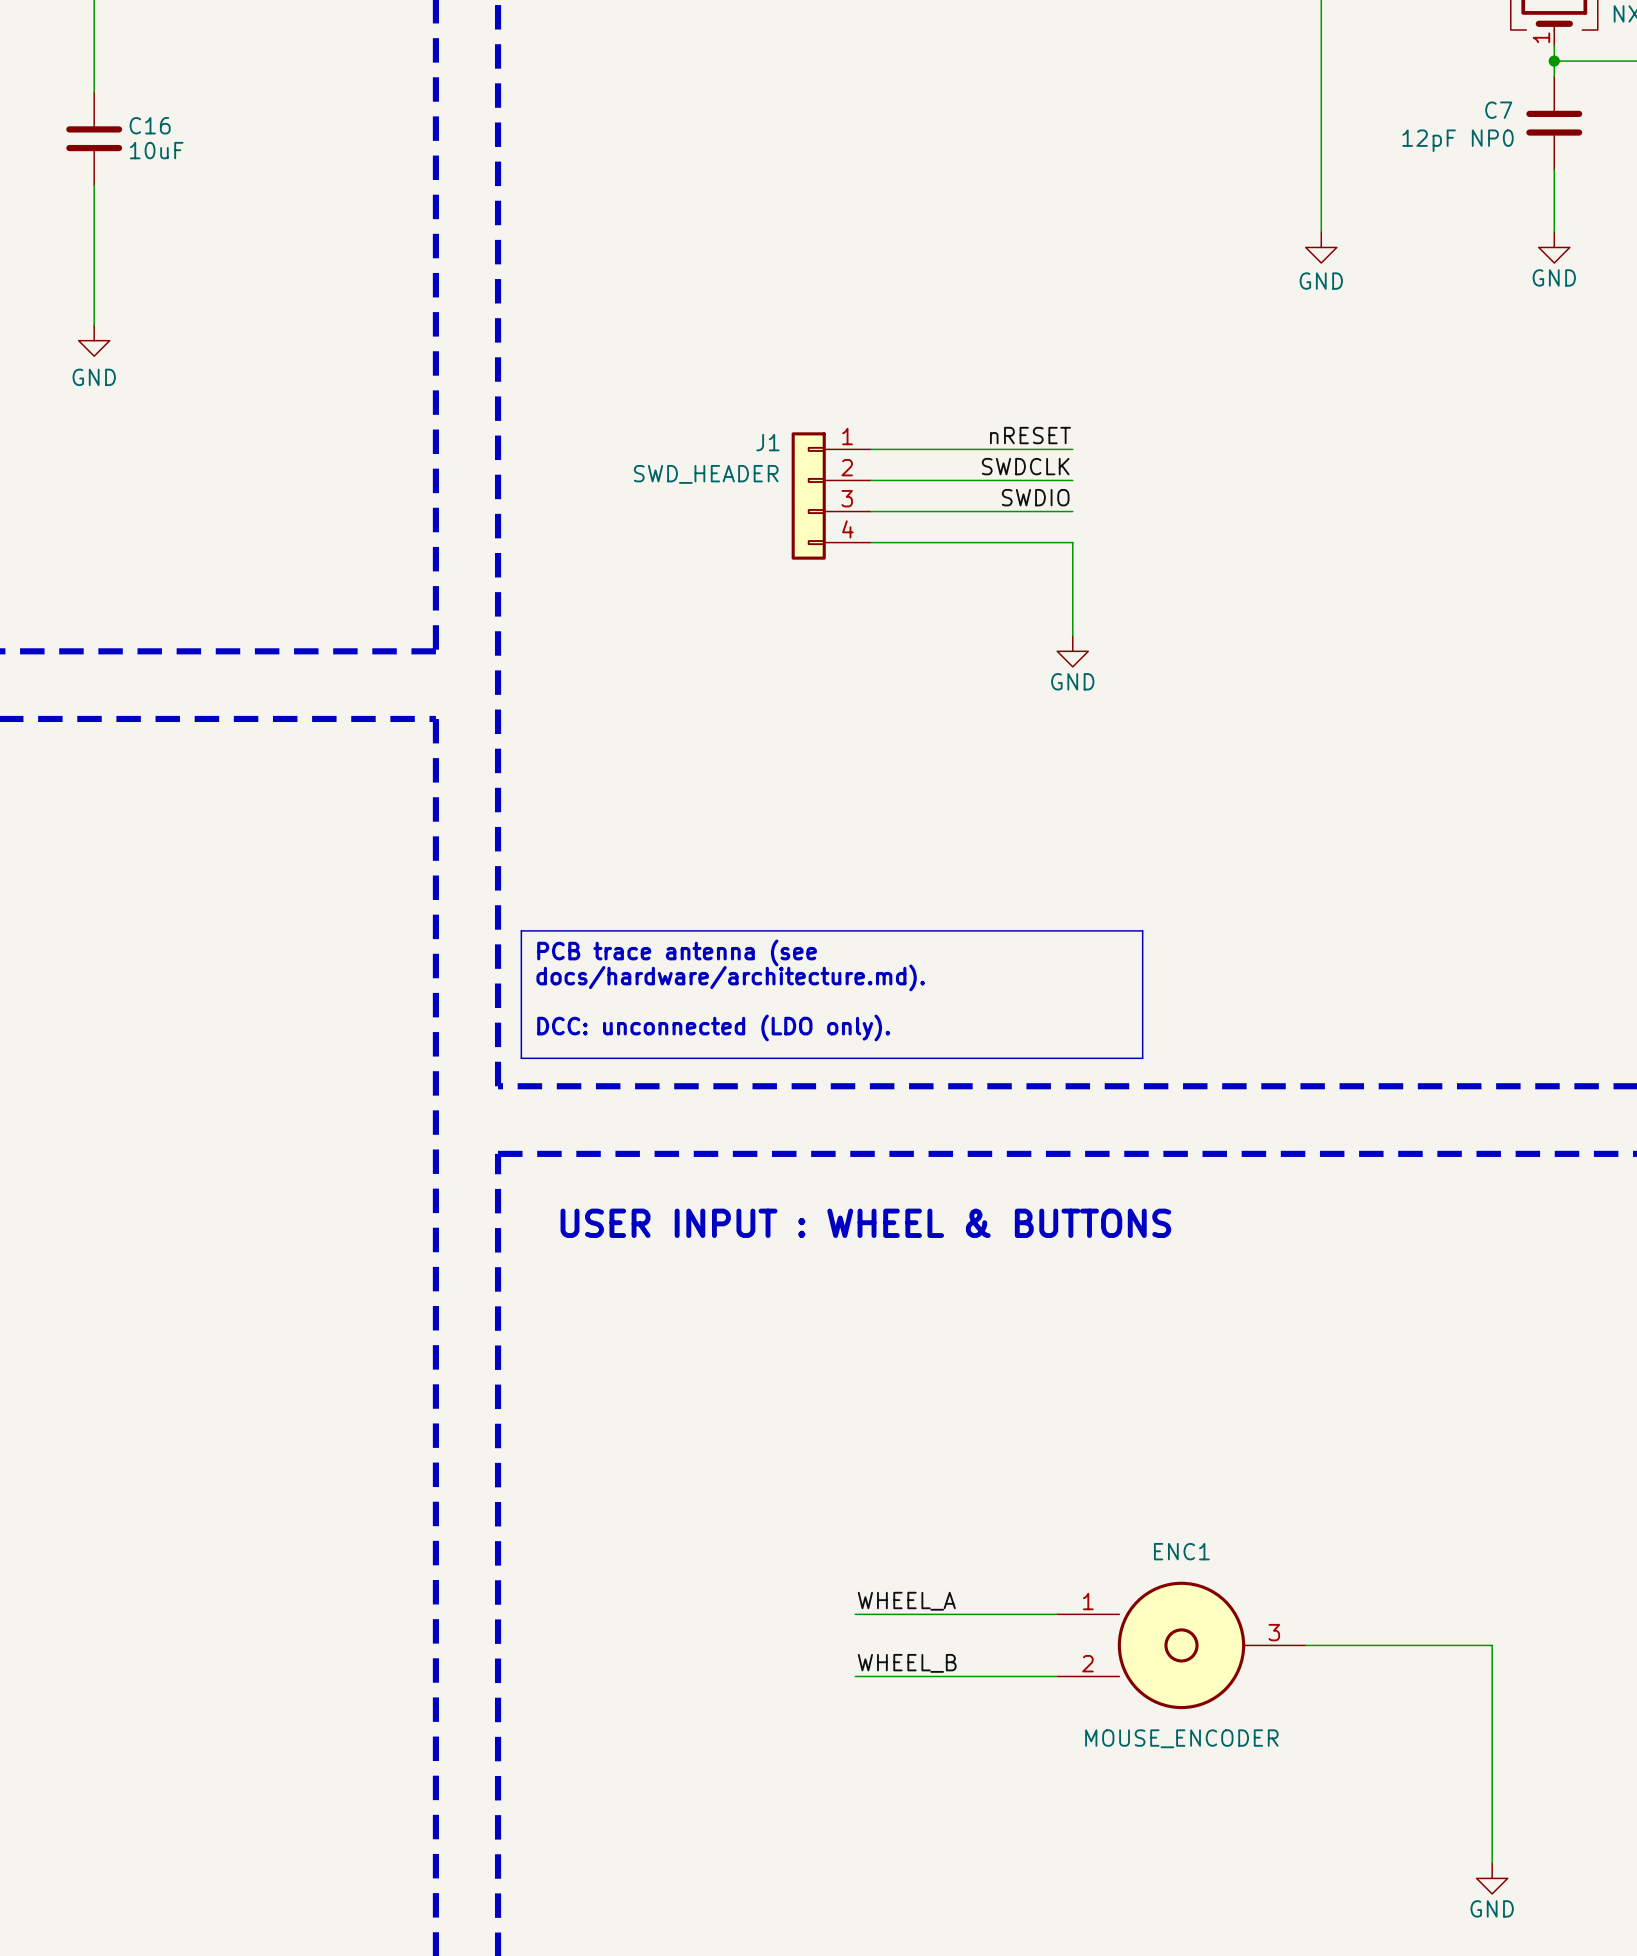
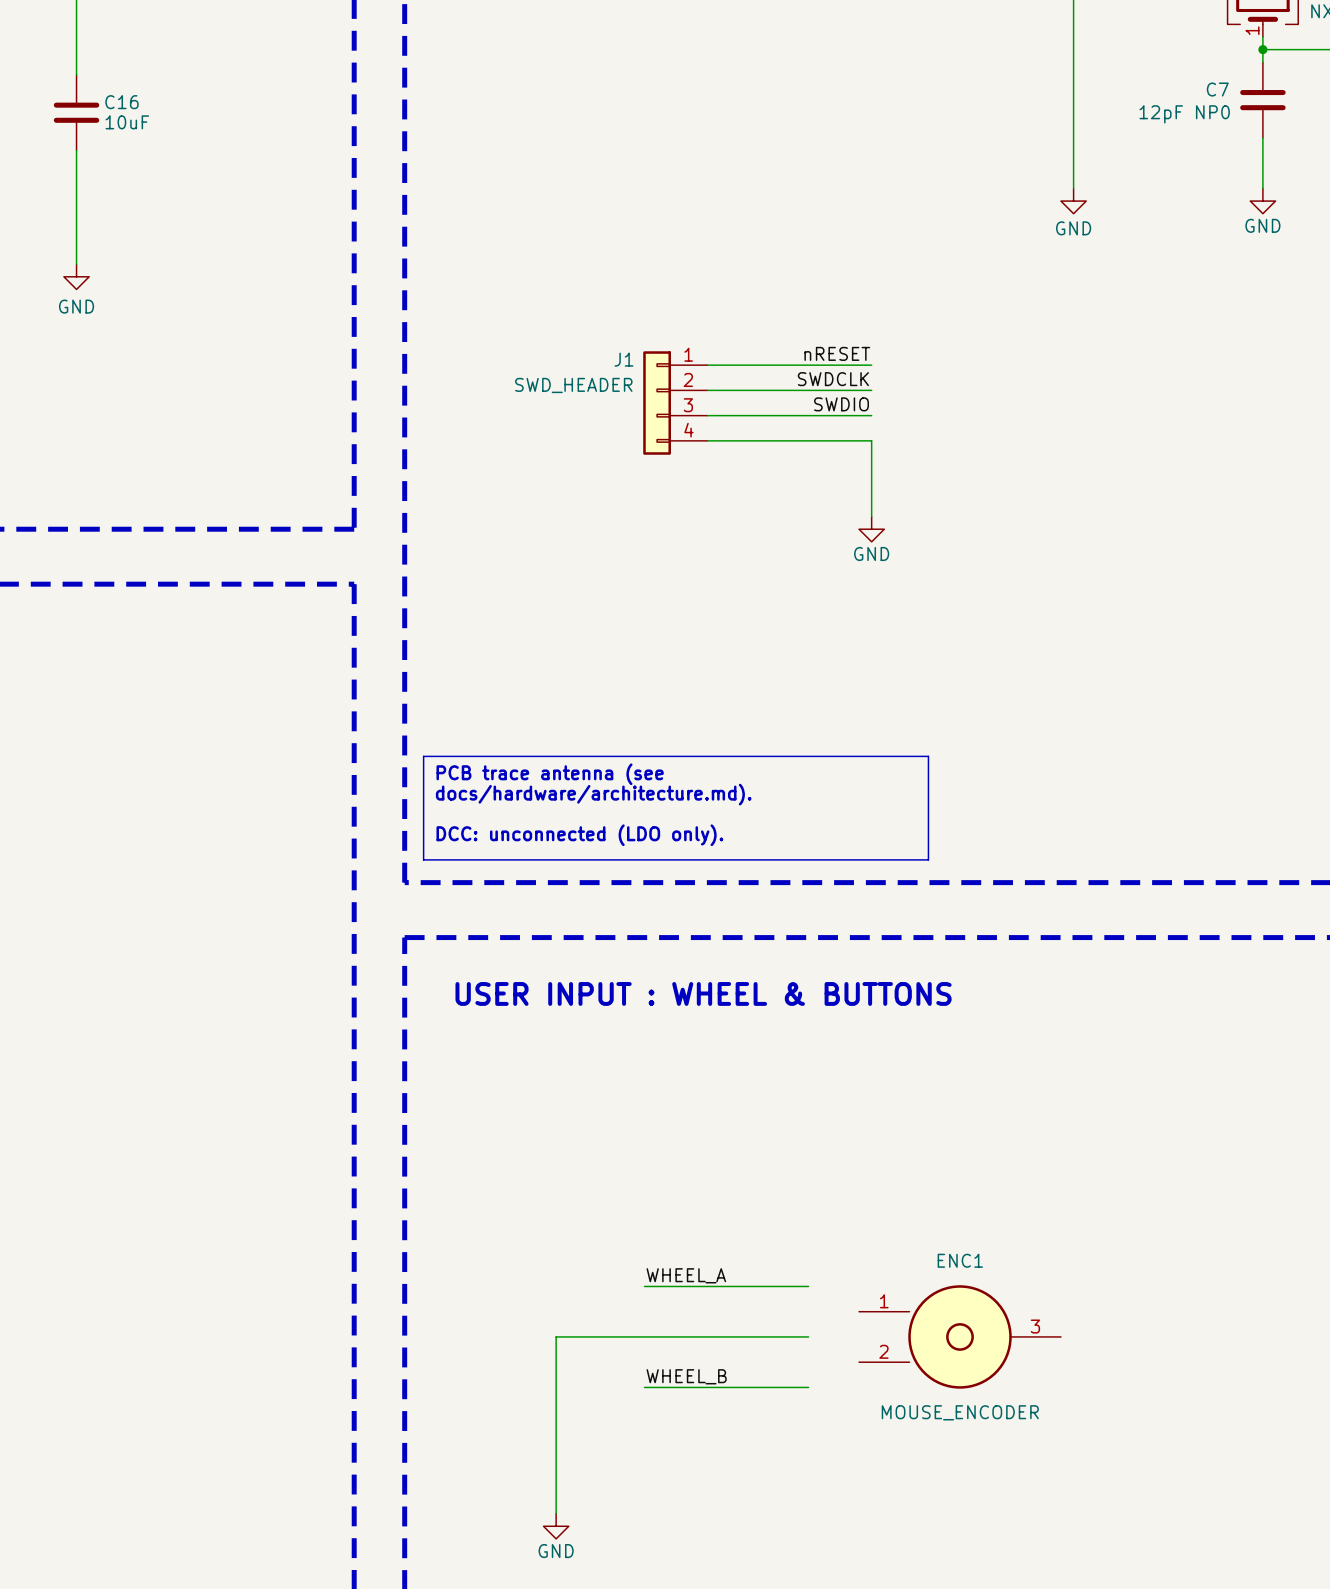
label position: WHEEL_A (906, 1601) -> WHEEL_A (686, 1275)
wire: (855, 1614) (1057, 1614) -> (644, 1286) (808, 1286)
wire: none -> (808, 1336) (556, 1336) (556, 1513)
wire: (1305, 1645) (1492, 1645) (1492, 1862) -> none
label position: WHEEL_B (907, 1663) -> WHEEL_B (686, 1376)
wire: (855, 1676) (1057, 1676) -> (644, 1387) (808, 1387)
power symbol: none -> GND (556, 1526)
power symbol: GND (1492, 1878) -> none

